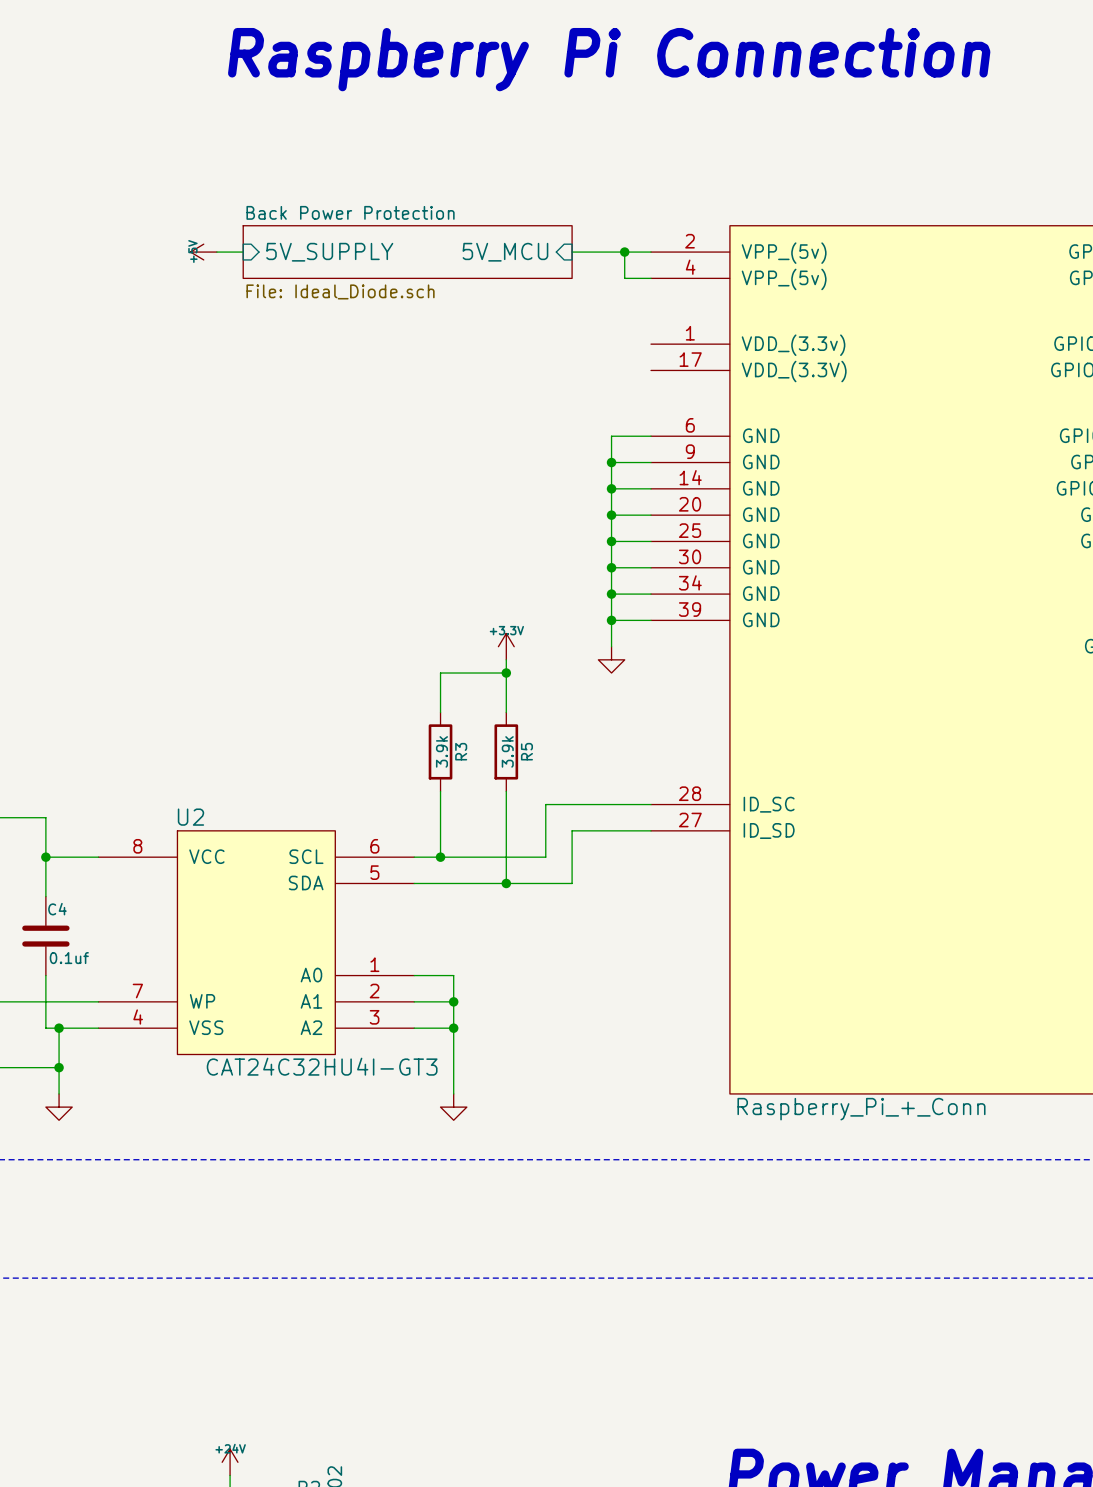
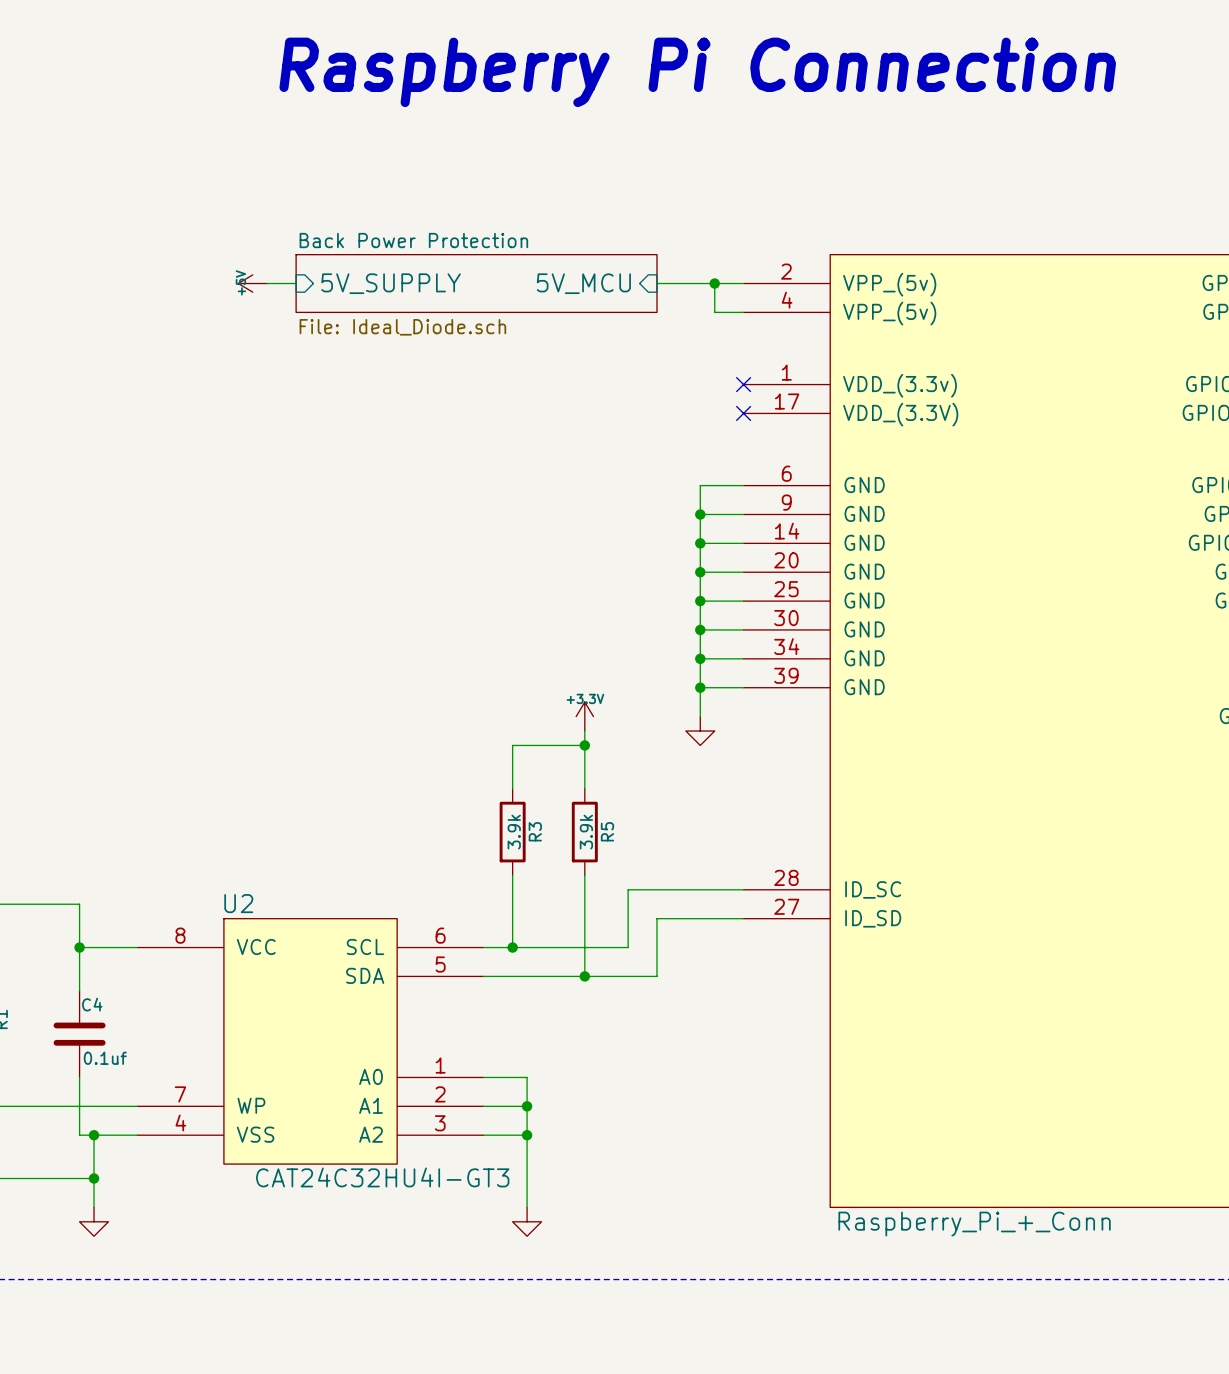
no-connect mark: none -> (743, 384)
no-connect mark: none -> (743, 413)

